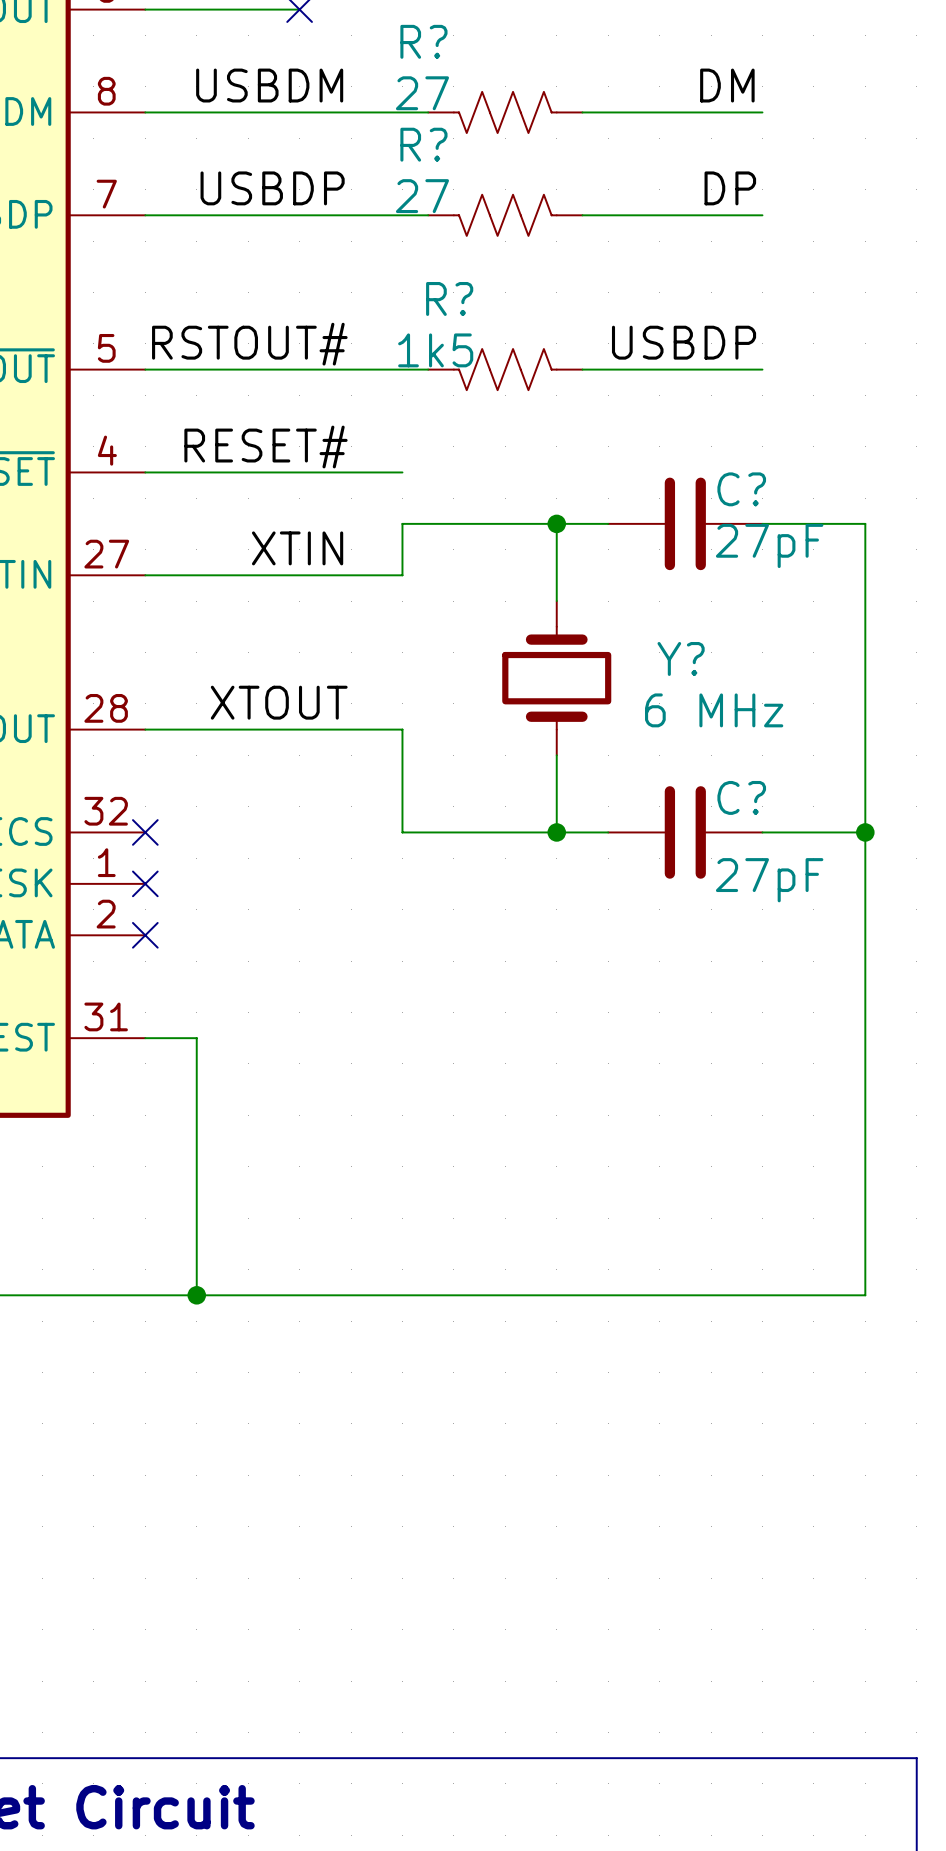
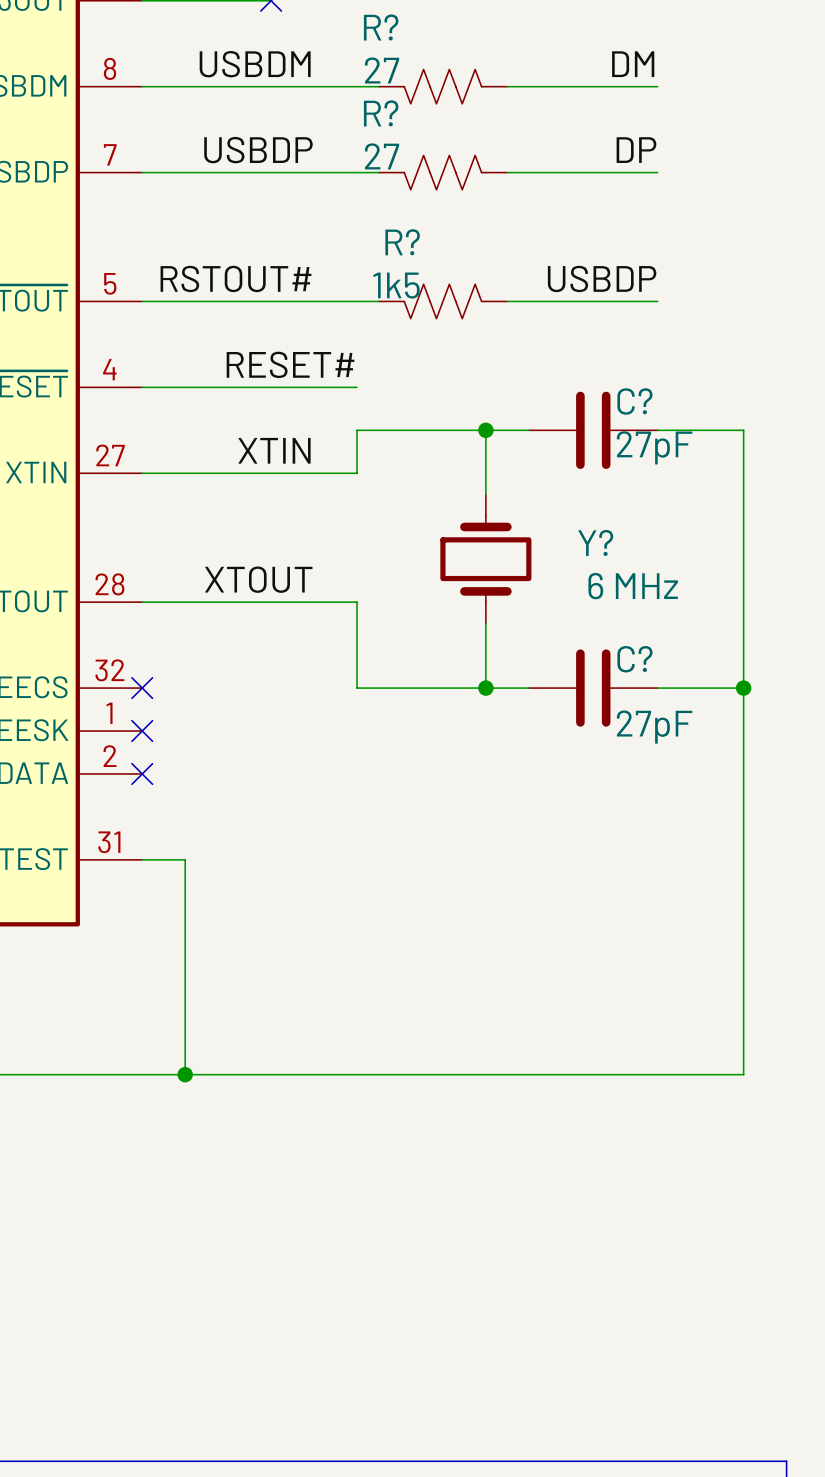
label position: RESET# (265, 447) -> RESET# (290, 364)

